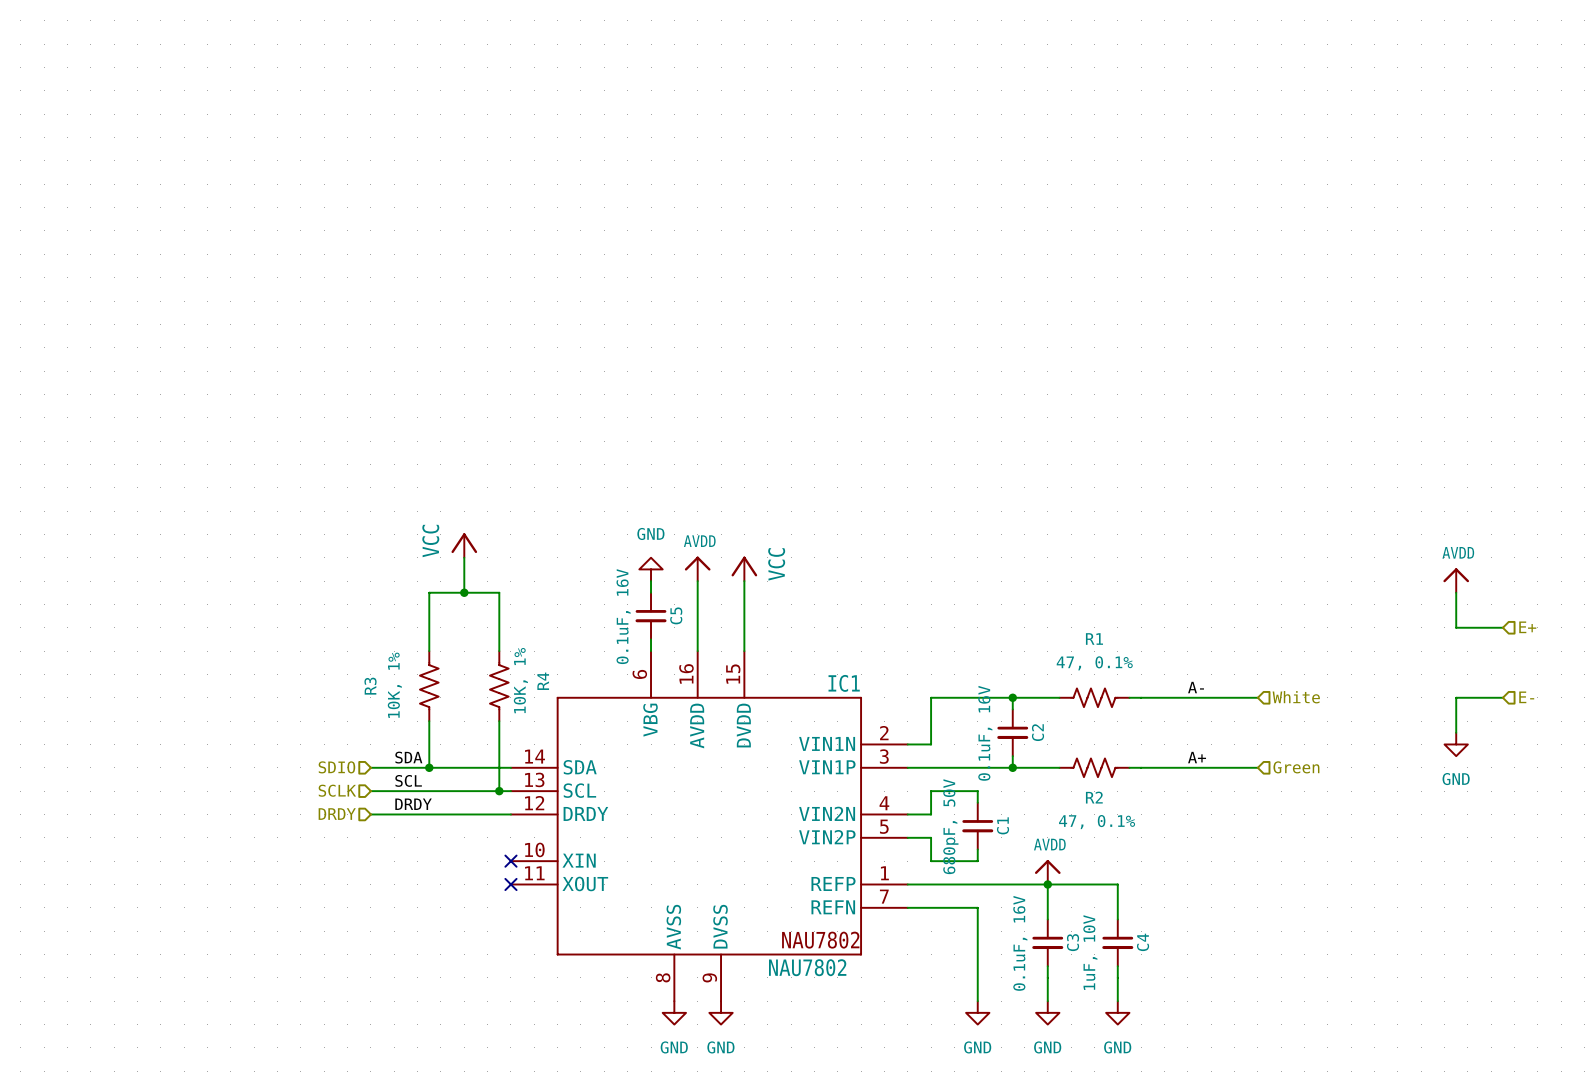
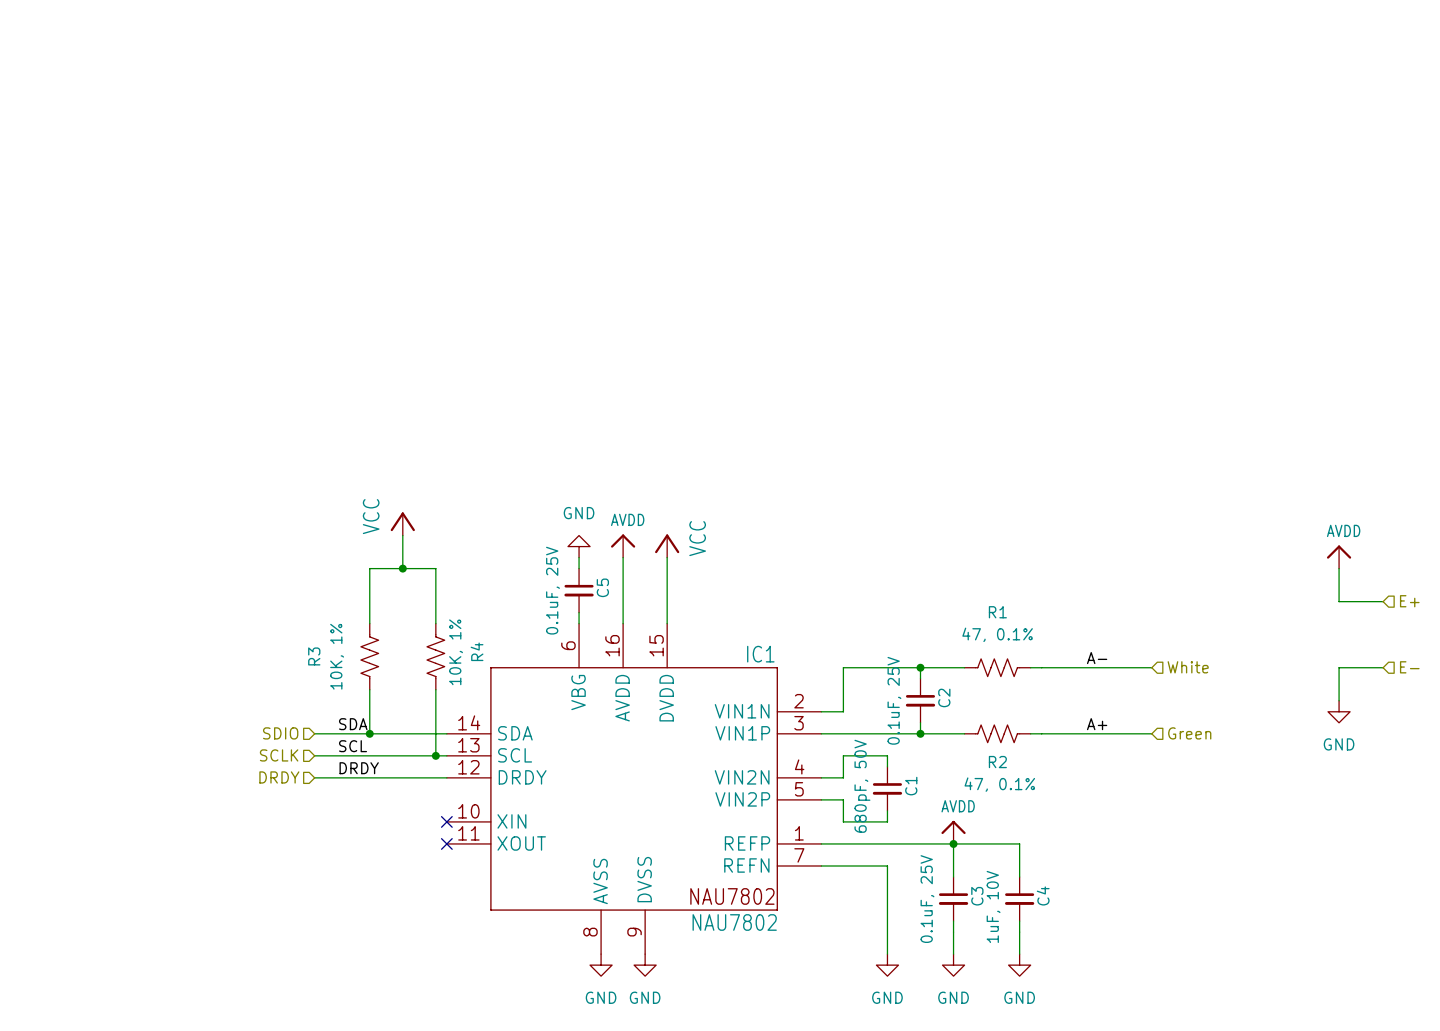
C5 value: 0.1uF, 16V (623, 616) -> 0.1uF, 25V (552, 590)
C2 value: 0.1uF, 16V (985, 733) -> 0.1uF, 25V (894, 700)
C3 value: 0.1uF, 16V (1020, 943) -> 0.1uF, 25V (927, 899)

